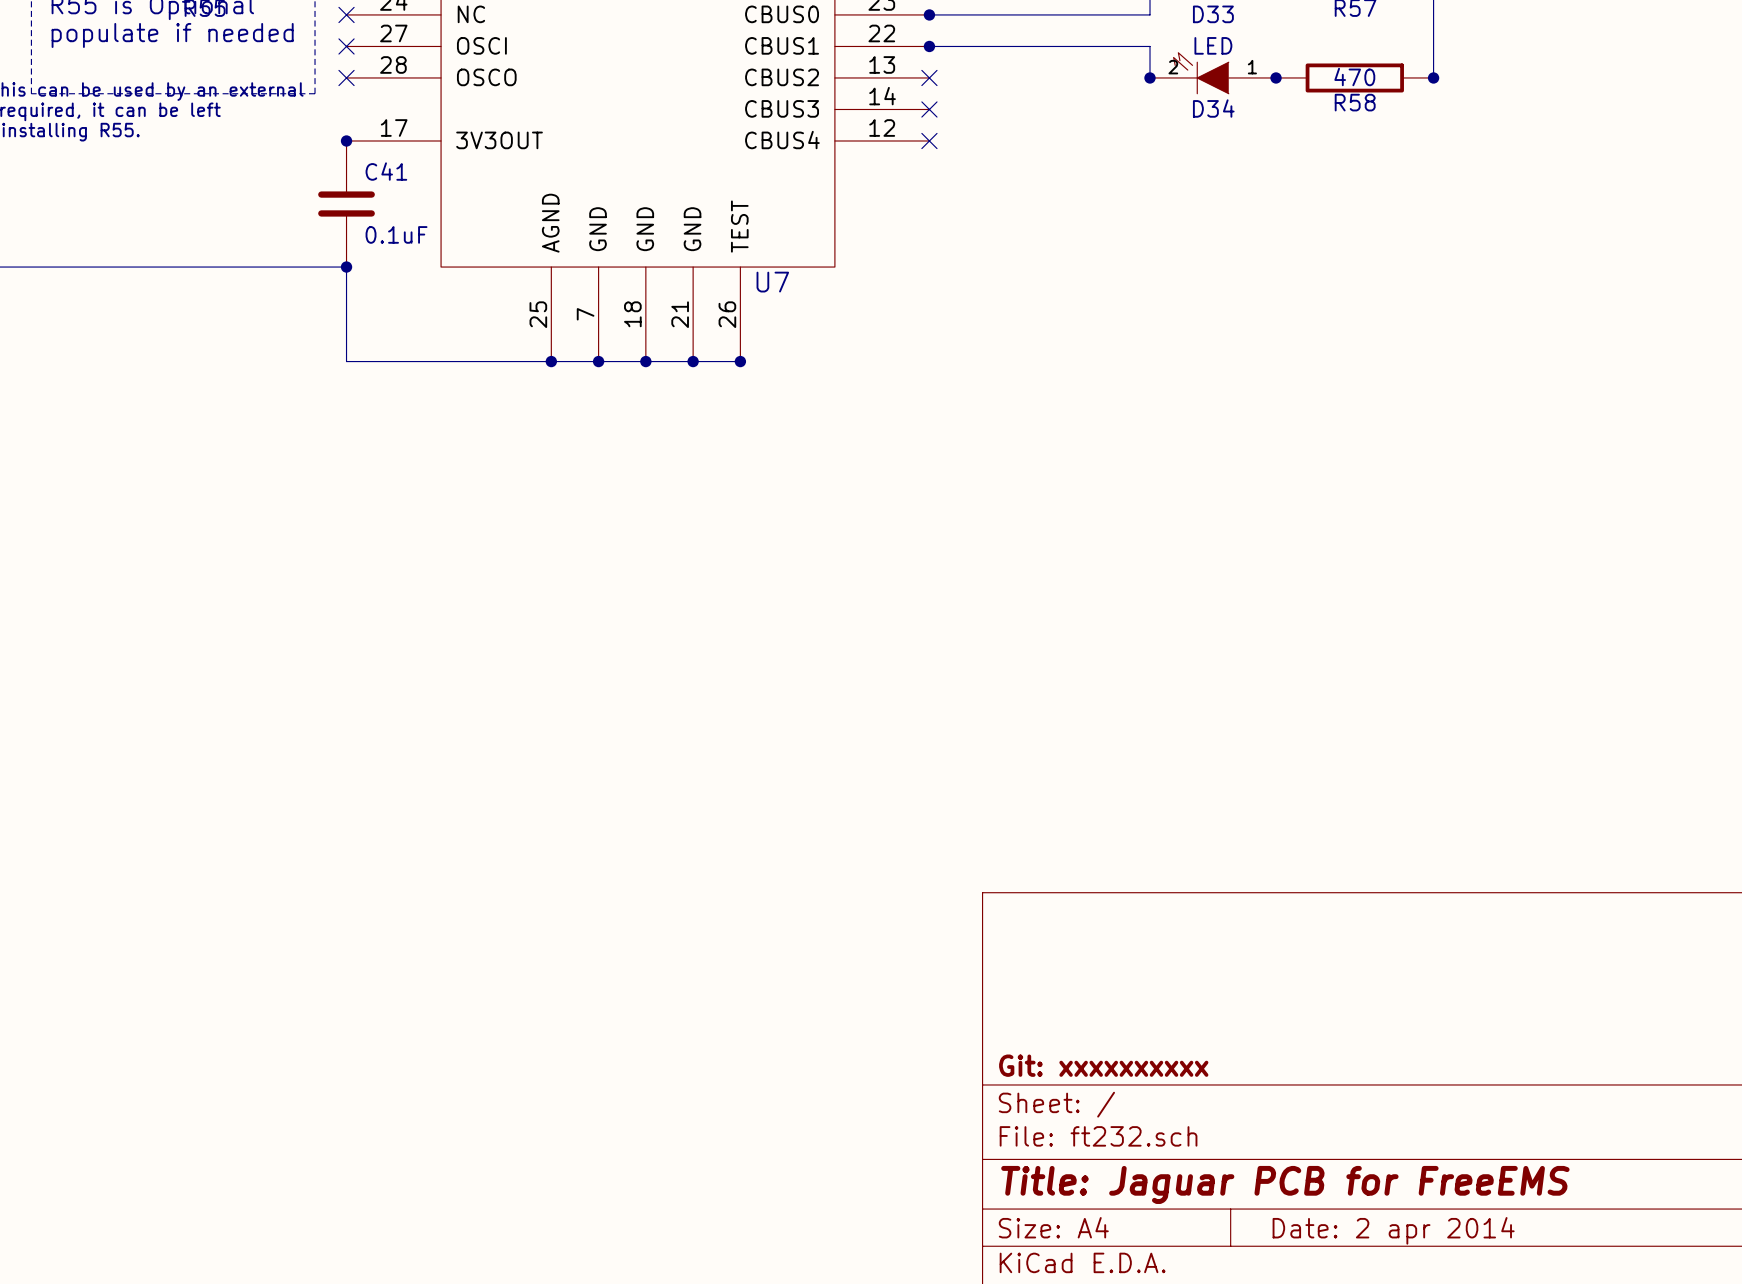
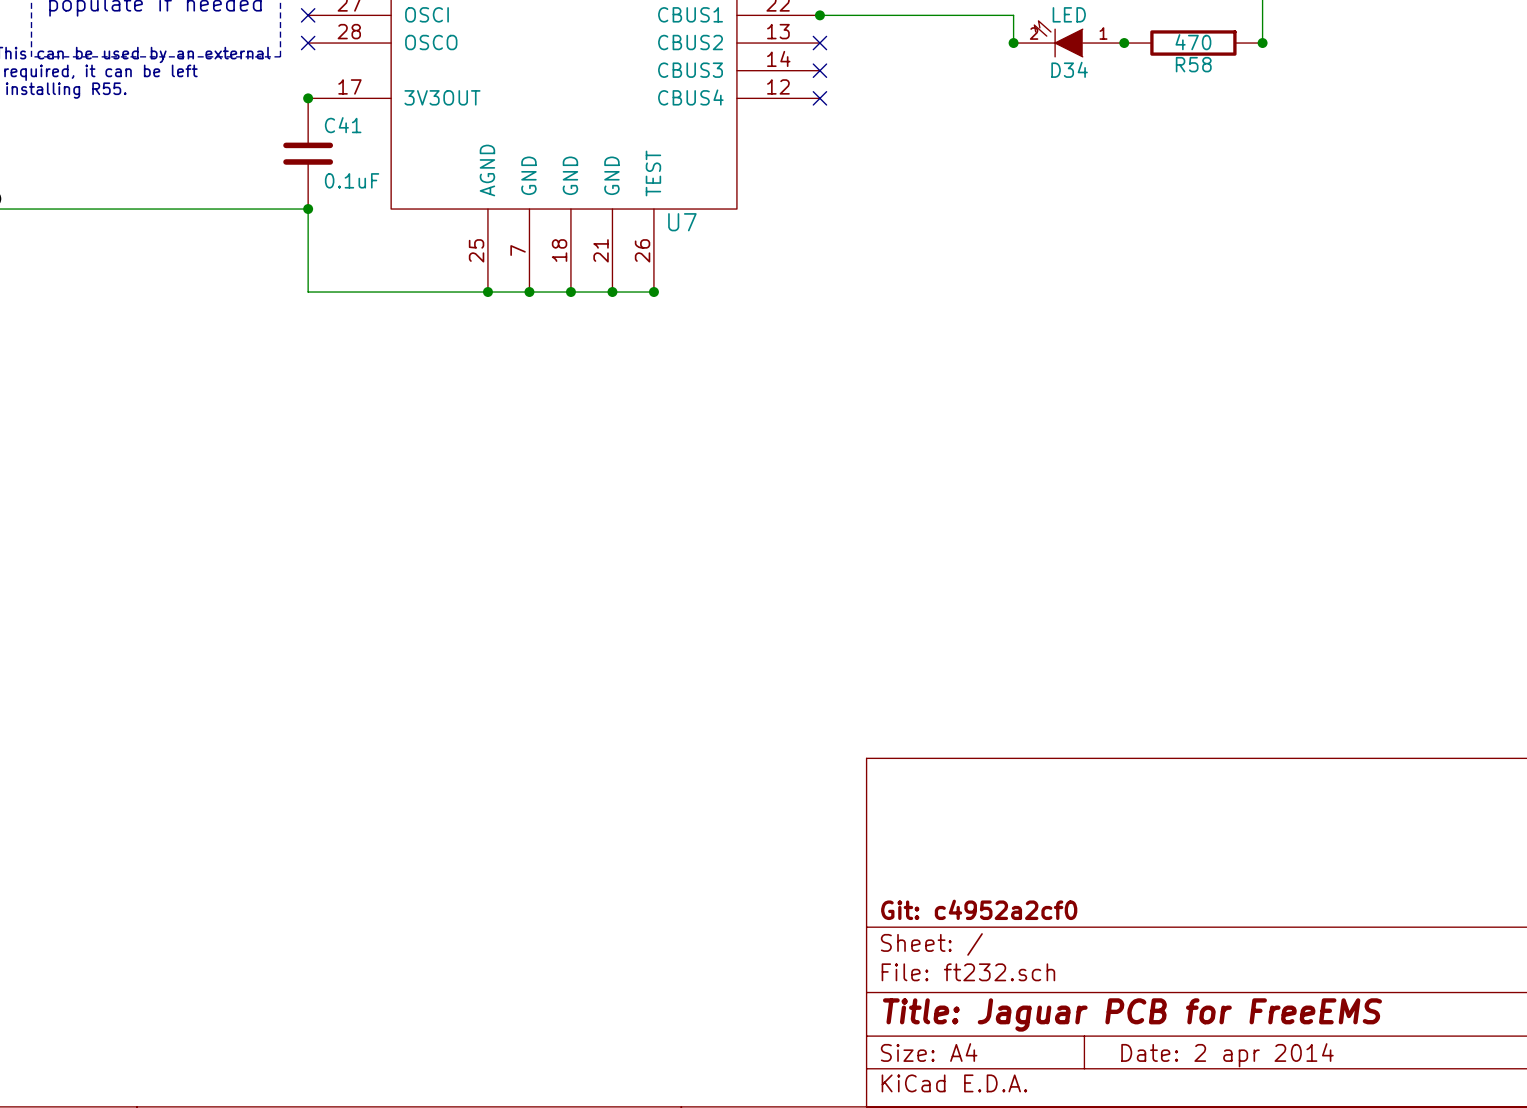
title block: Git: xxxxxxxxxx (1103, 1065) -> Git: c4952a2cf0 (979, 909)

